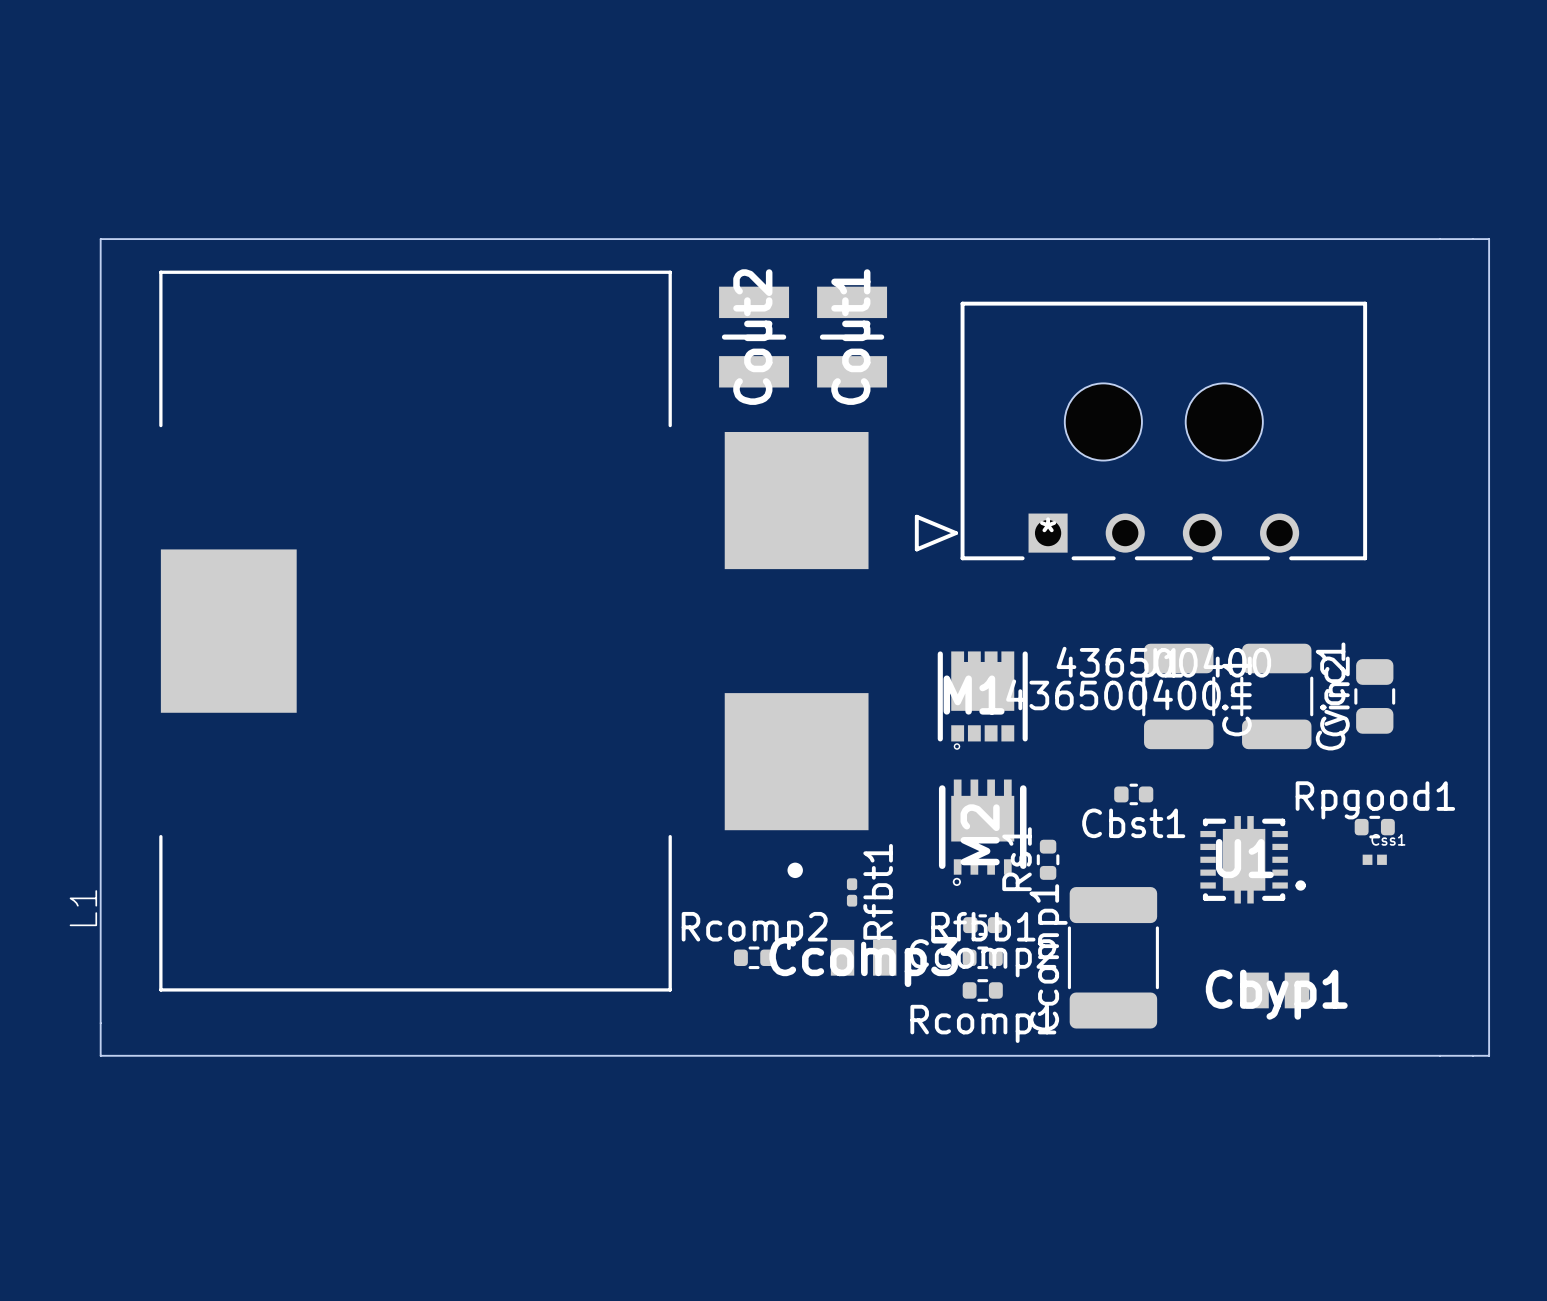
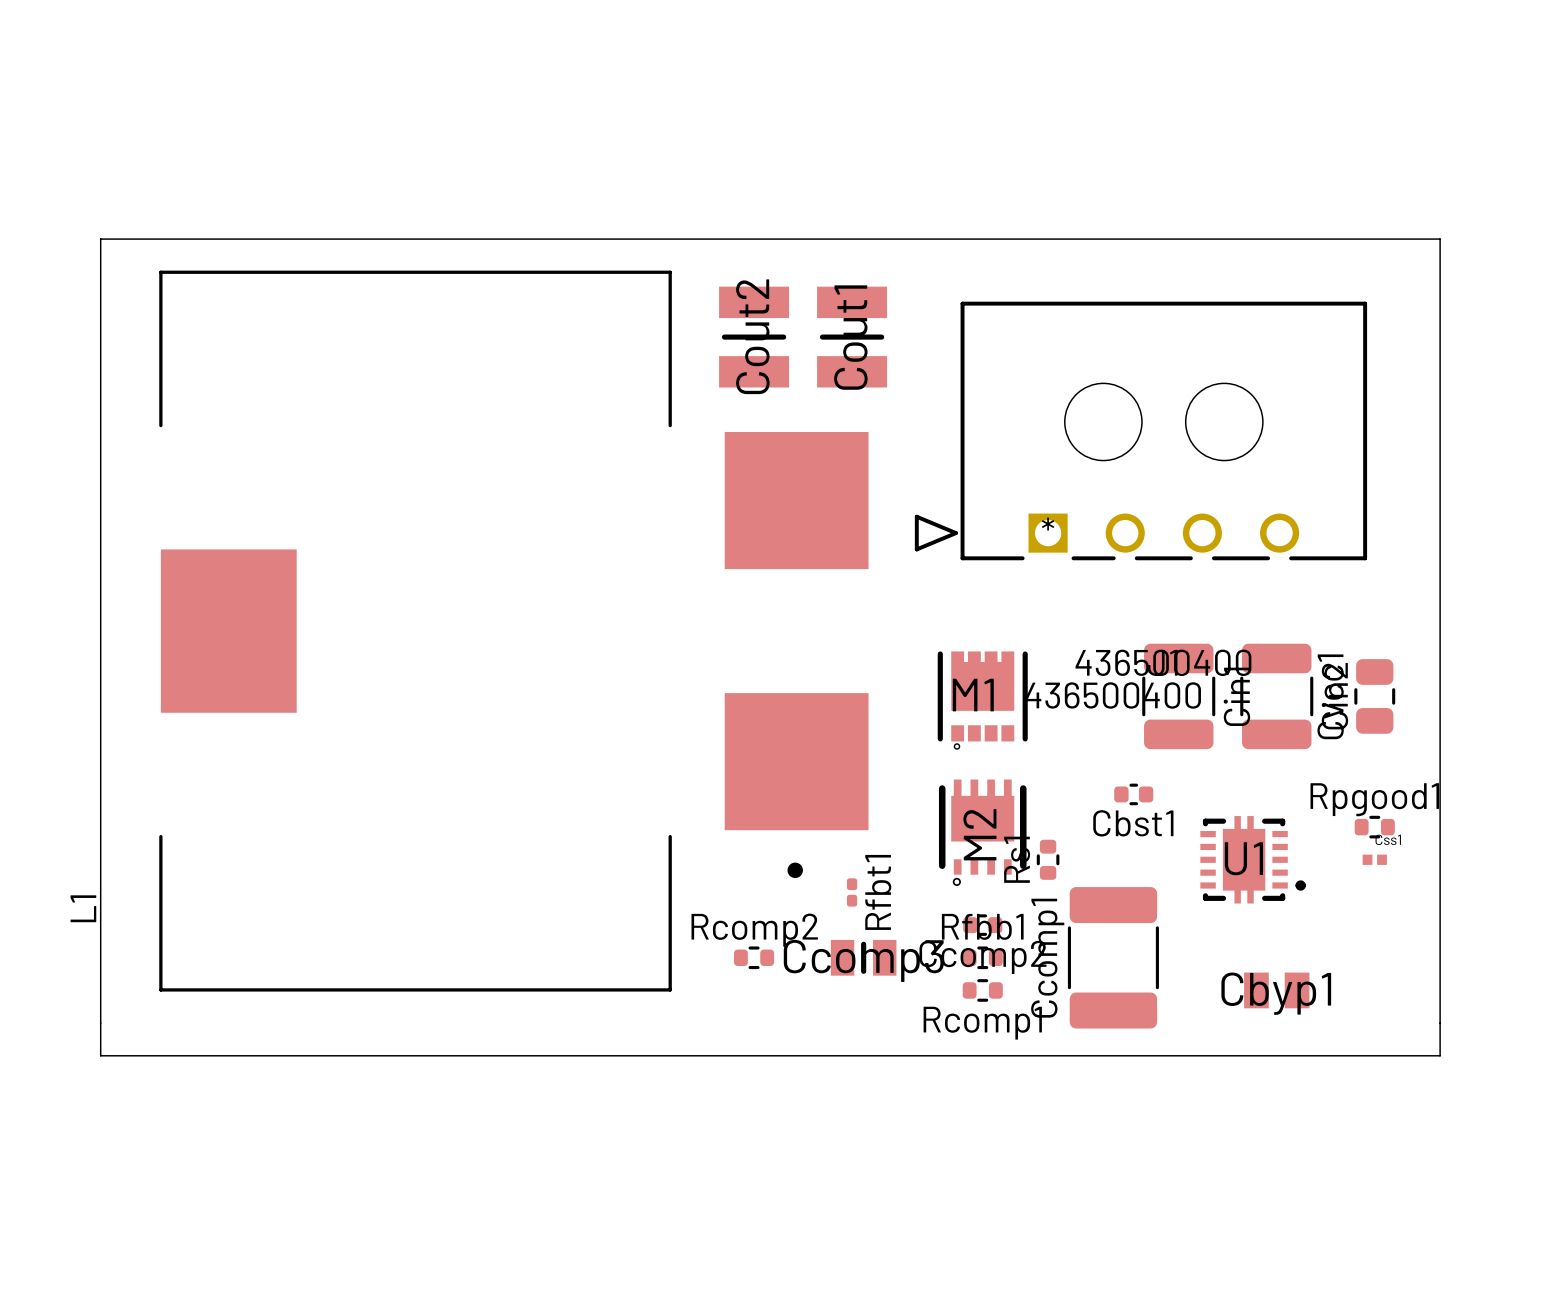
board edge: (1440, 239) (1489, 239) (1489, 1055) (1440, 1055) -> (1440, 239) (1440, 1055)

